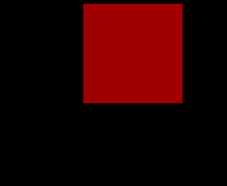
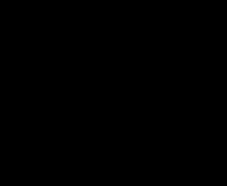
part: (132, 53) -> none

